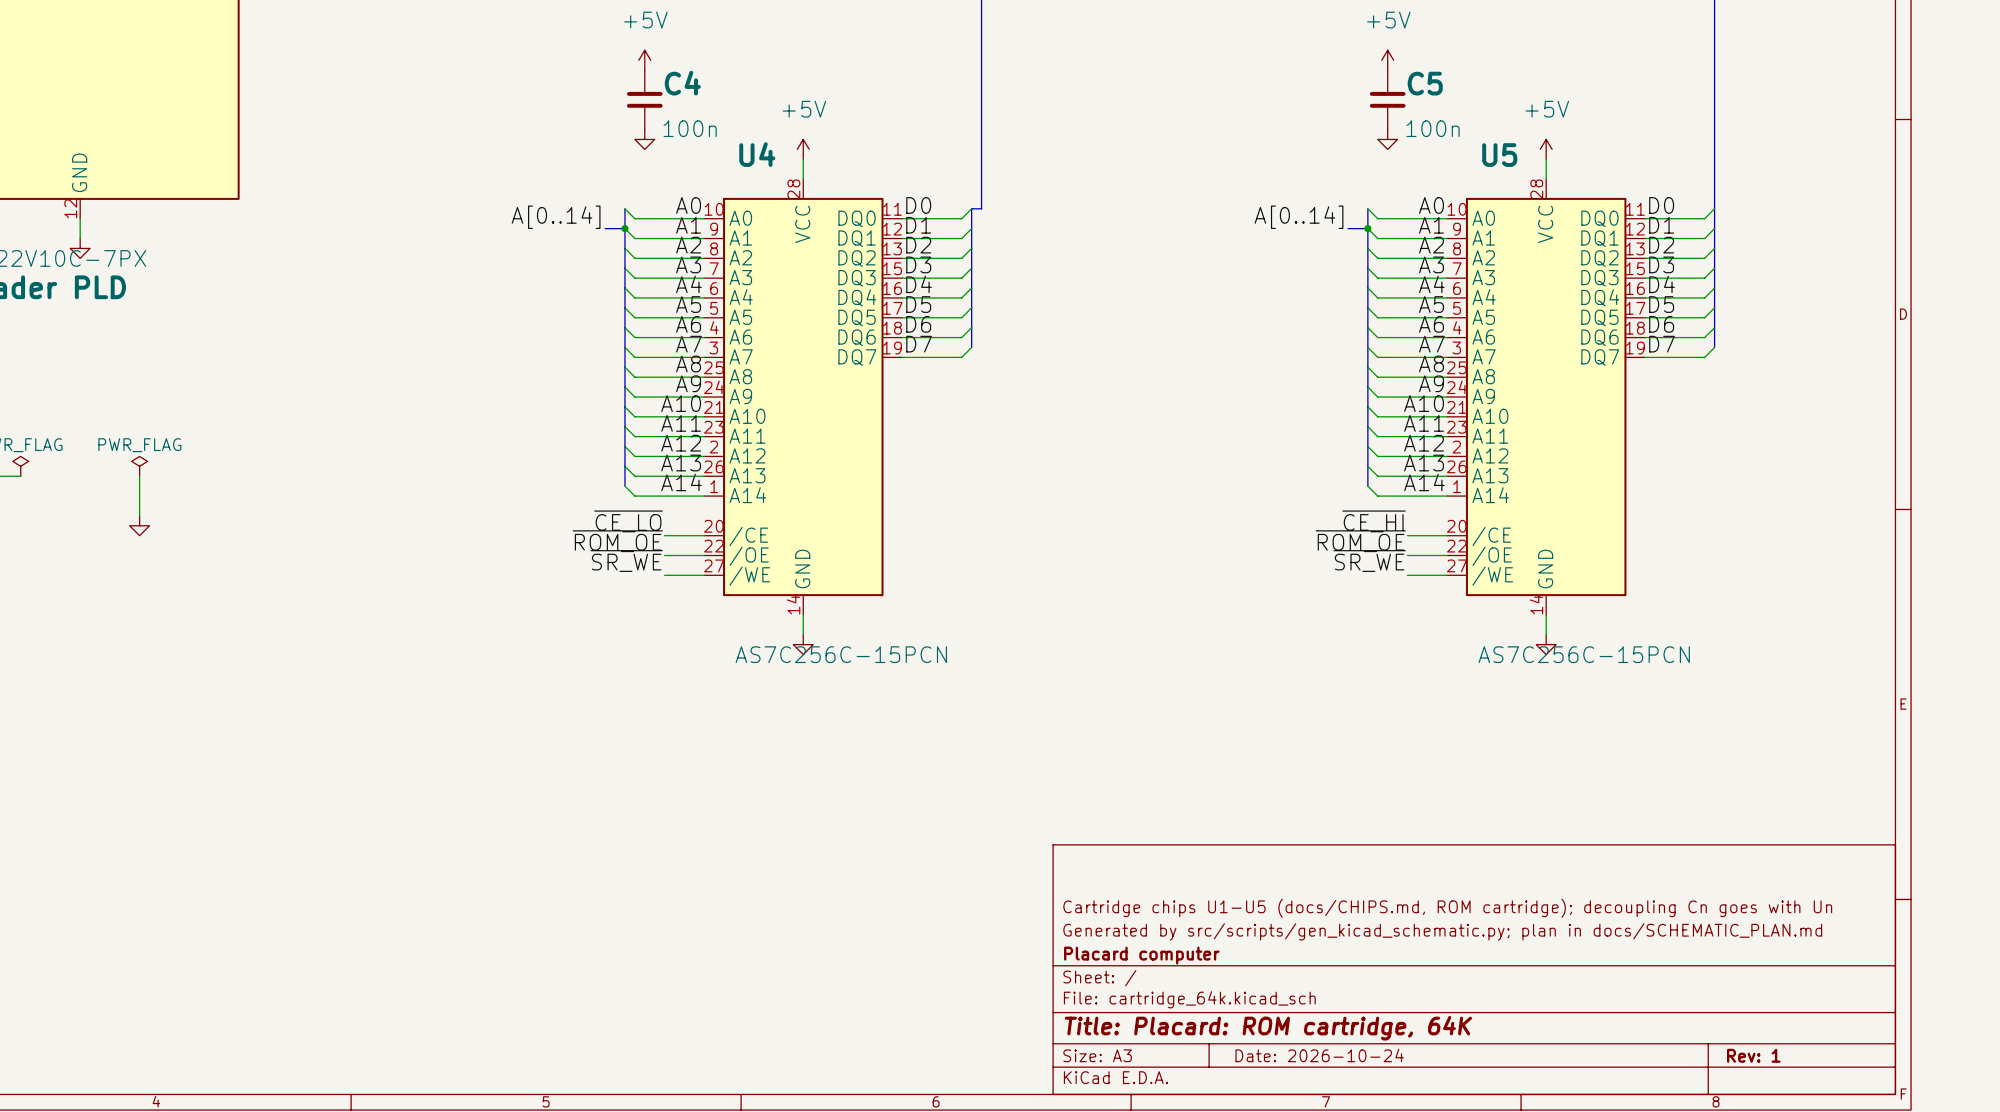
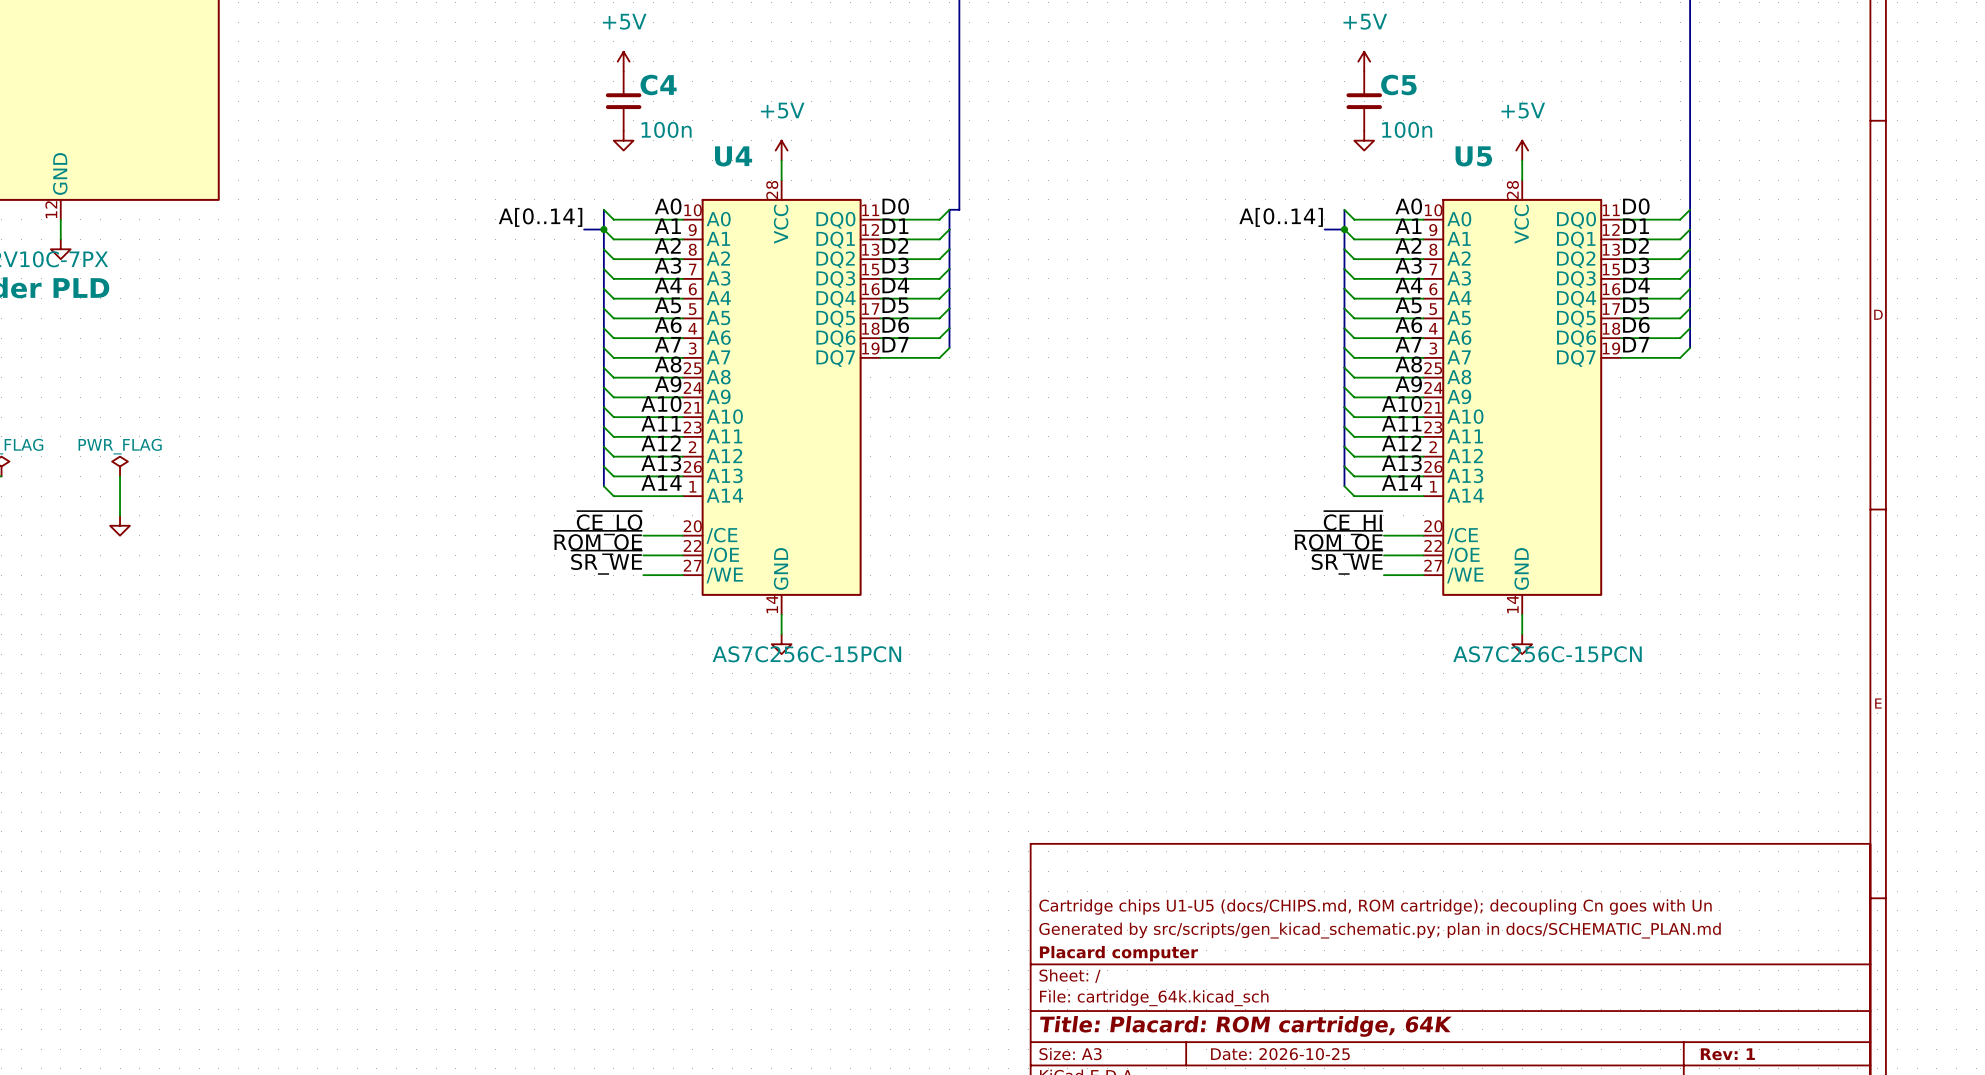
title block: Date: 2026-10-24 (1319, 1055) -> Date: 2026-10-25 (1280, 1054)

